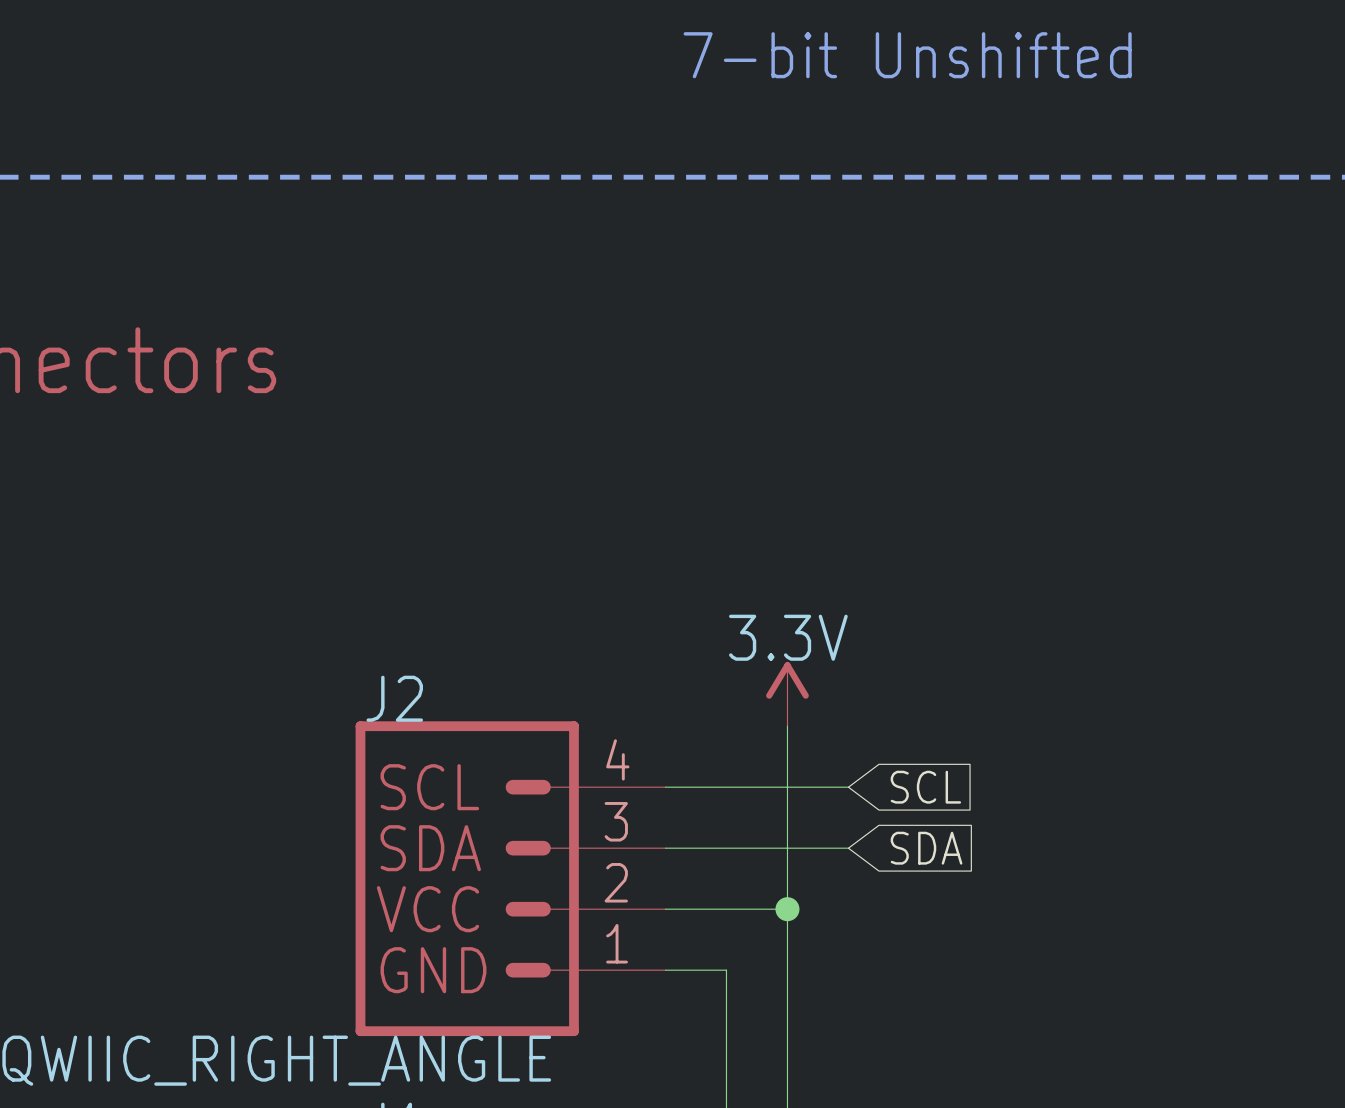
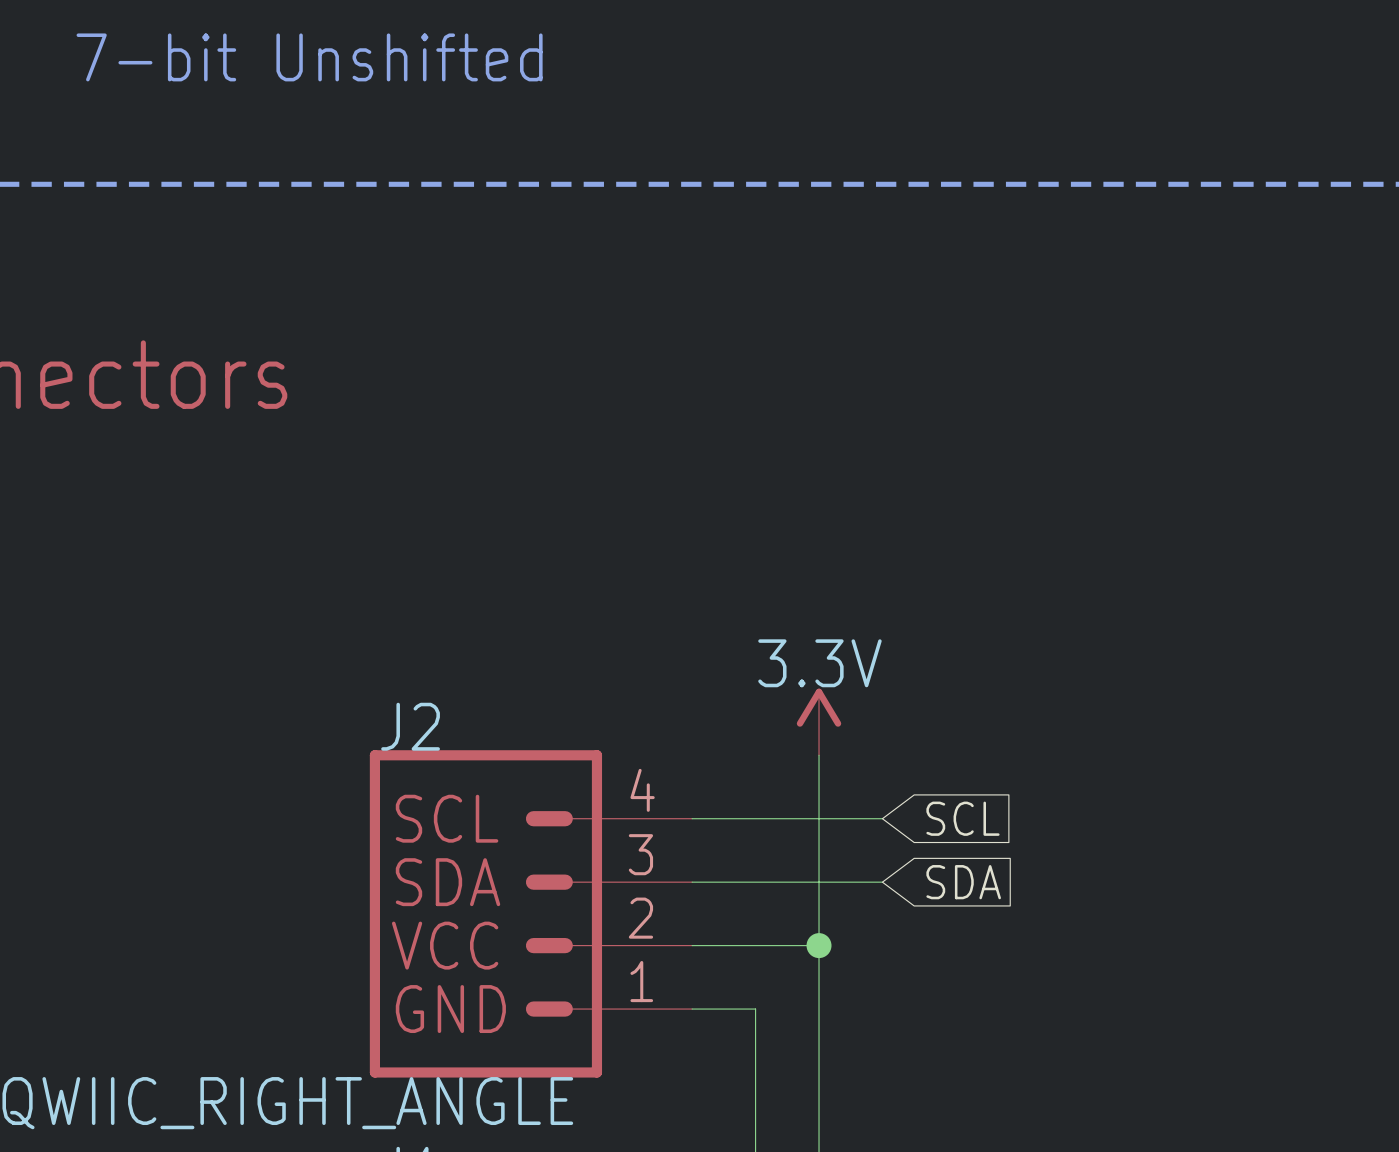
text: none -> 7-bit Unshifted (309, 57)
text: 7-bit Unshifted (907, 55) -> none

